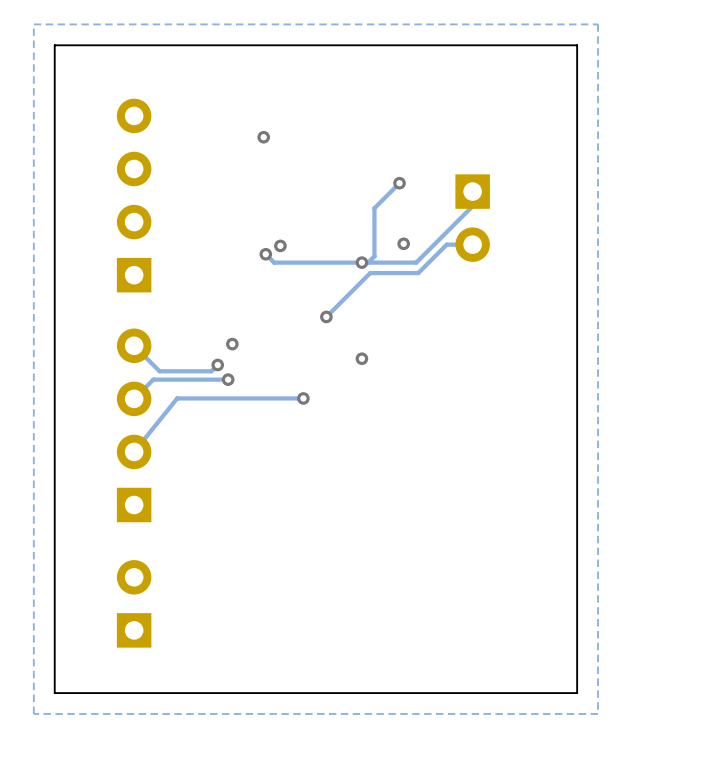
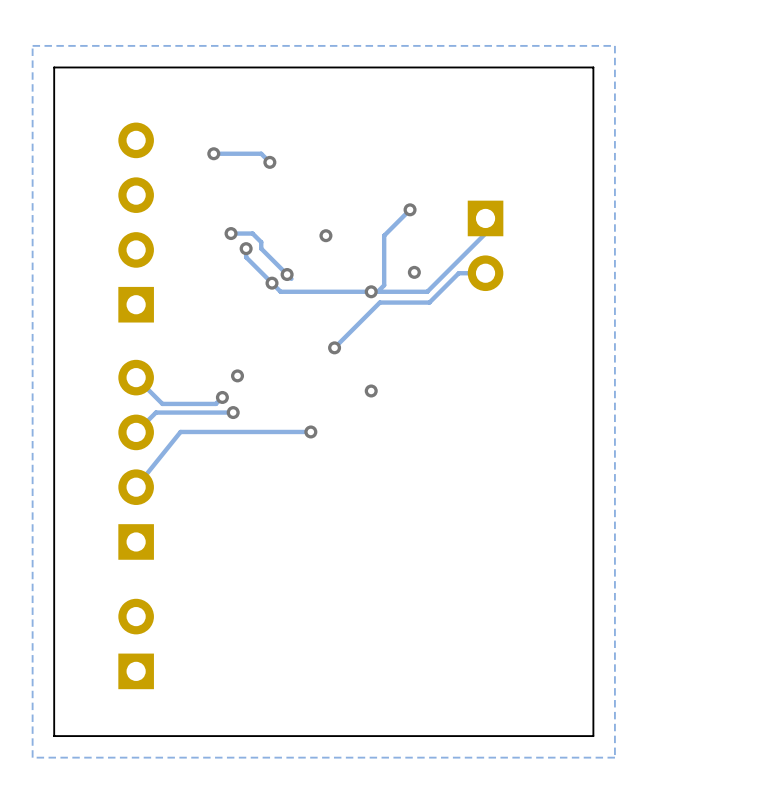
track: none -> (213, 153) (261, 153) (269, 162)
via: none -> (213, 153)
track: none -> (231, 233) (252, 233) (261, 242) (261, 248) (291, 278)
via: none -> (231, 233)
via: none -> (325, 235)
track: none -> (246, 248) (246, 257) (272, 283)
via: none -> (246, 248)

